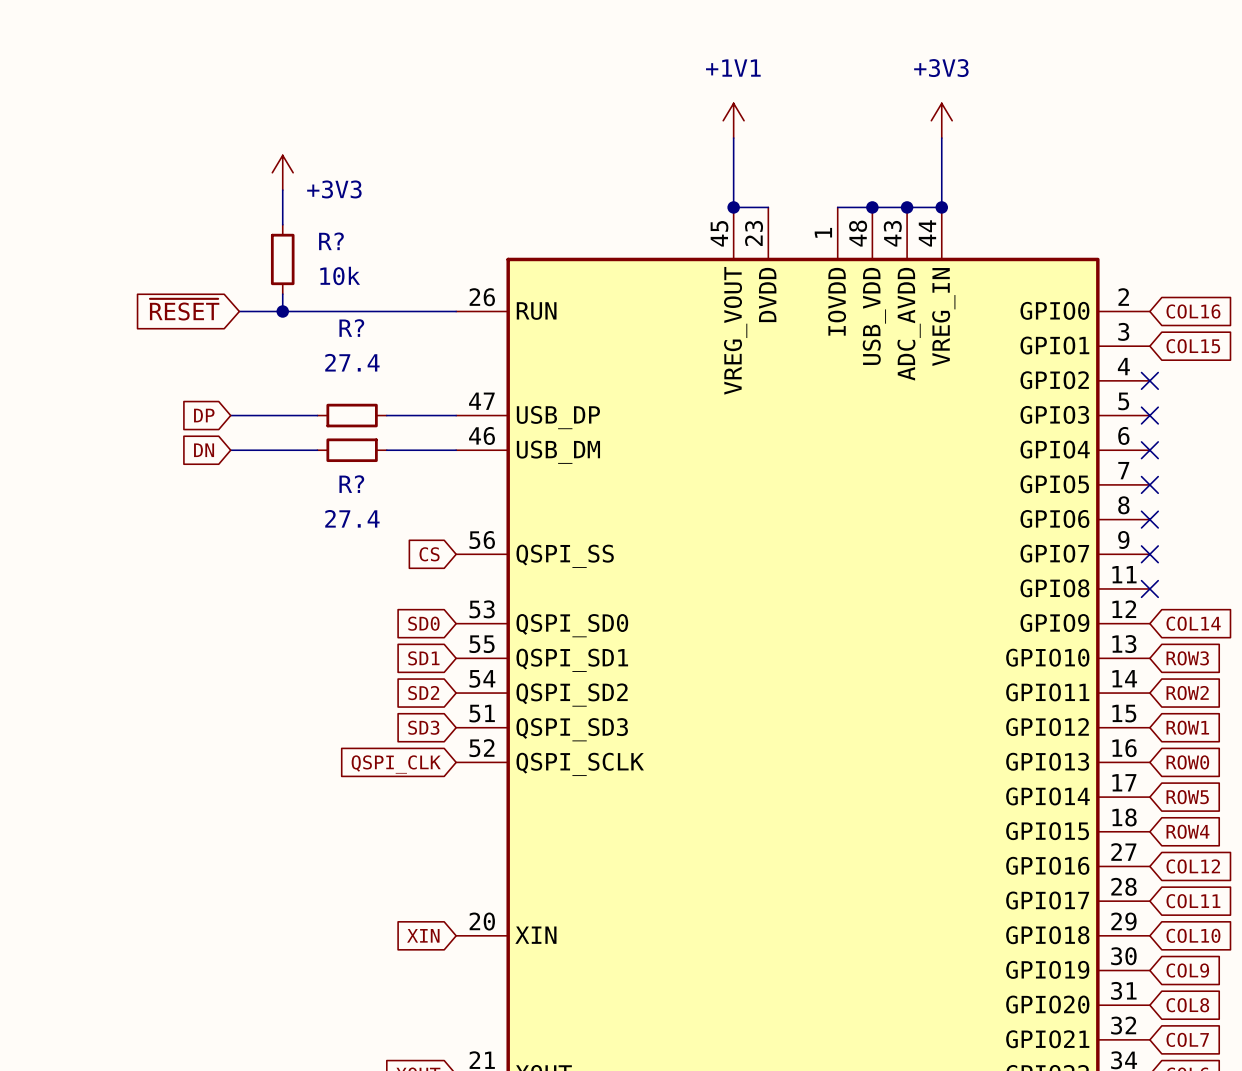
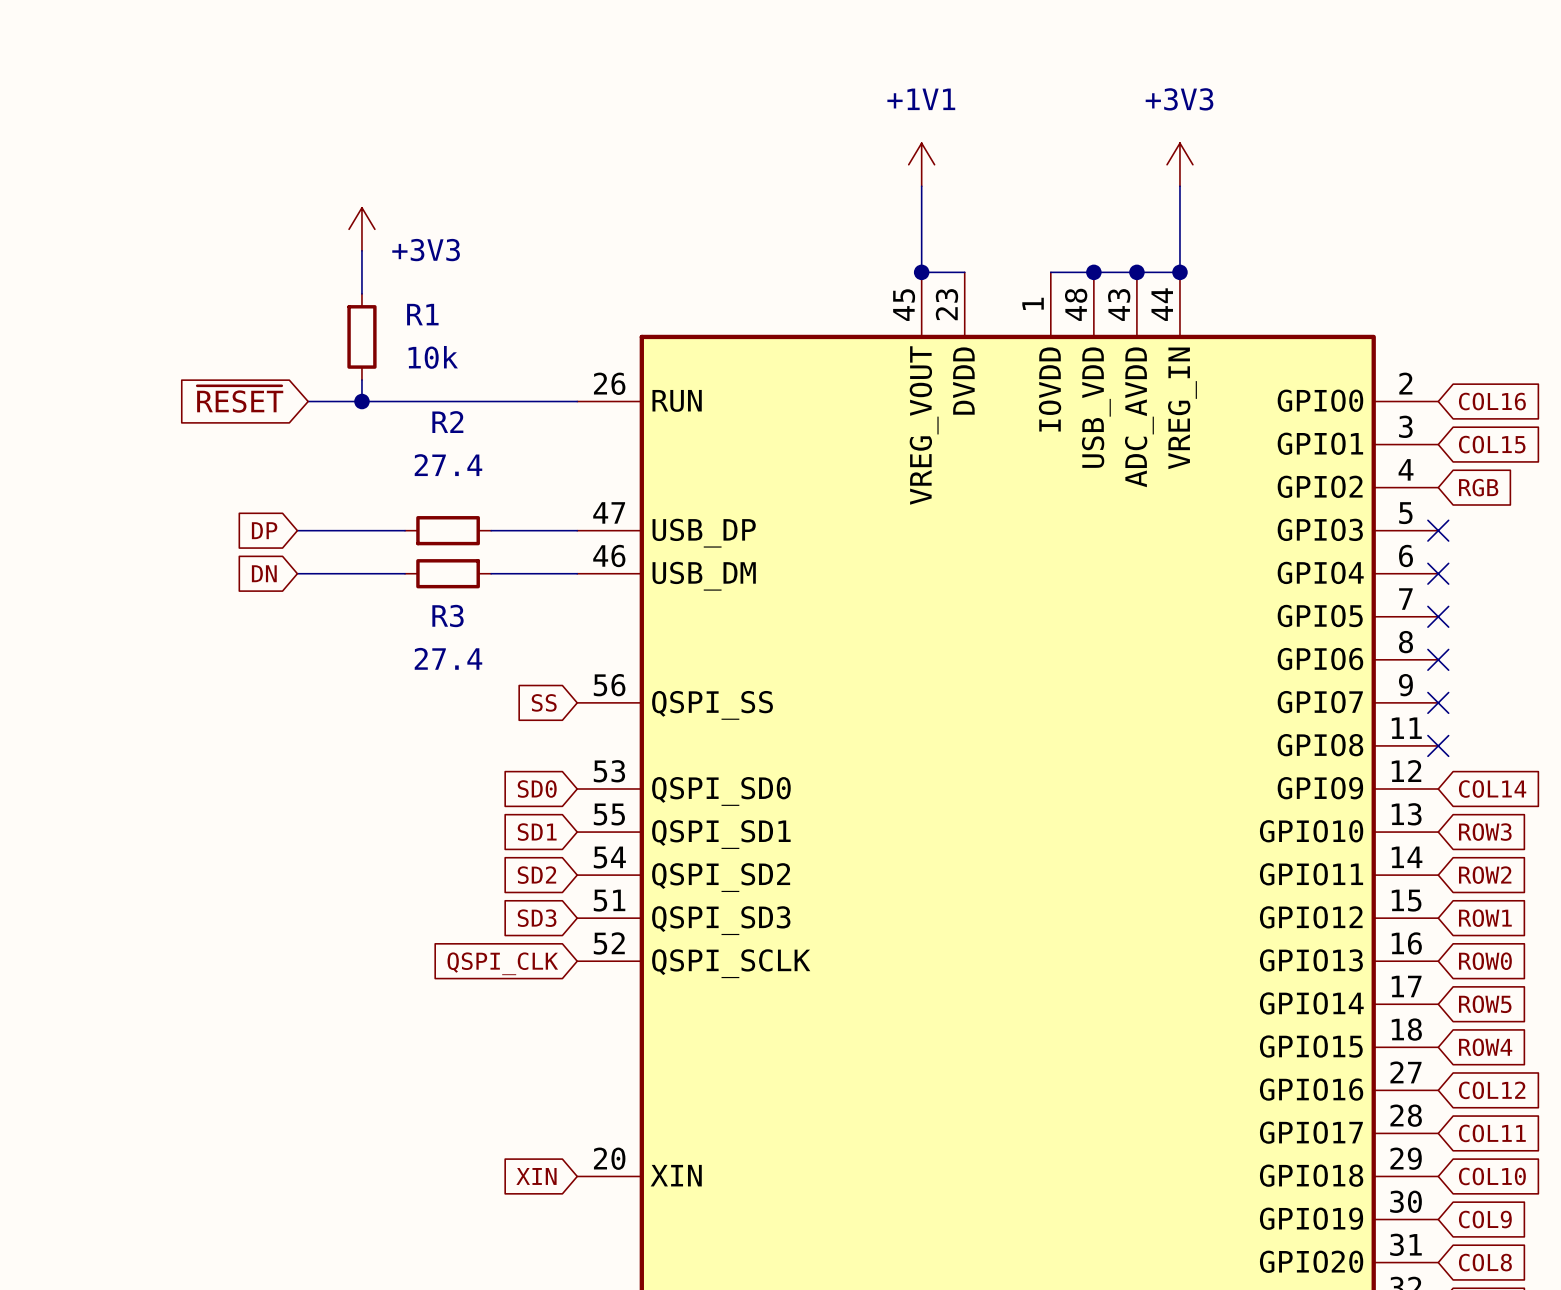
R? name: R? (331, 241) -> R1 (422, 314)
R? name: R? (351, 328) -> R2 (447, 422)
no-connect mark: (1149, 380) -> none
global label: none -> RGB (1478, 487)
R? name: R? (351, 484) -> R3 (448, 615)
global label: CS (429, 554) -> SS (544, 702)

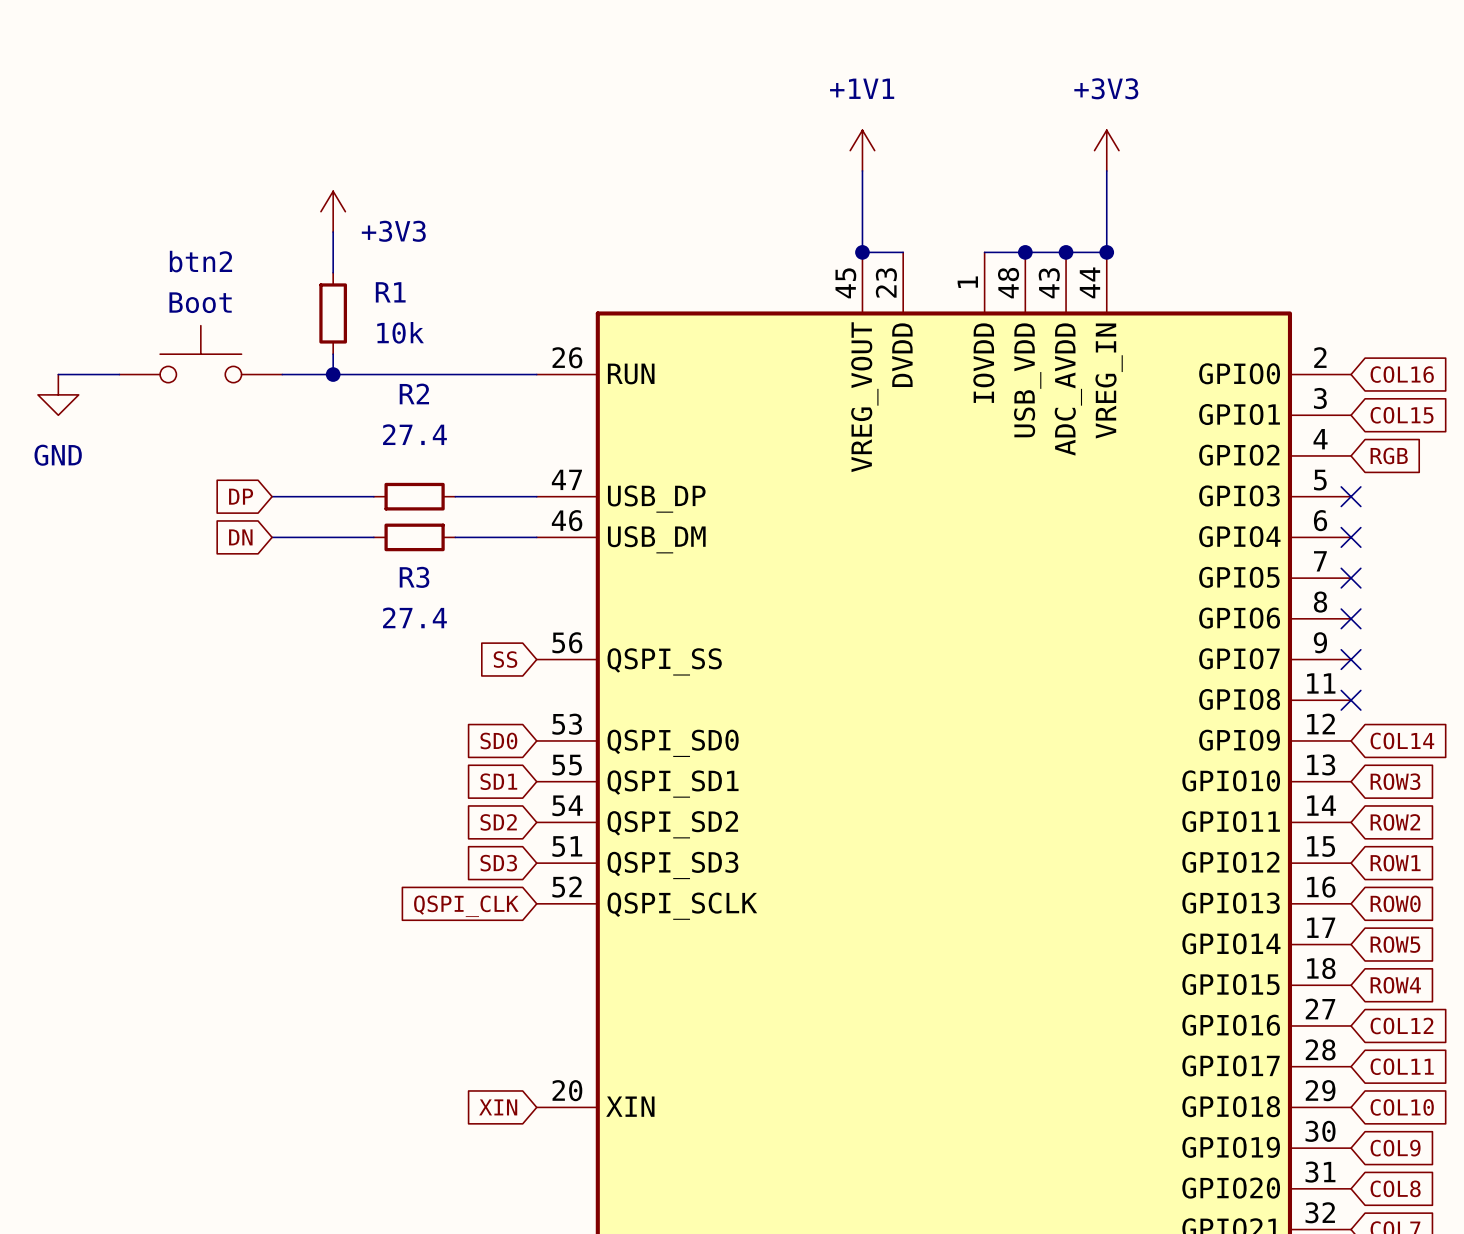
btn2: none -> Boot (200, 354)
global label: ~{RESET} (240, 399) -> none
wire: none -> (58, 374) (119, 374)
power symbol: none -> GND (58, 394)

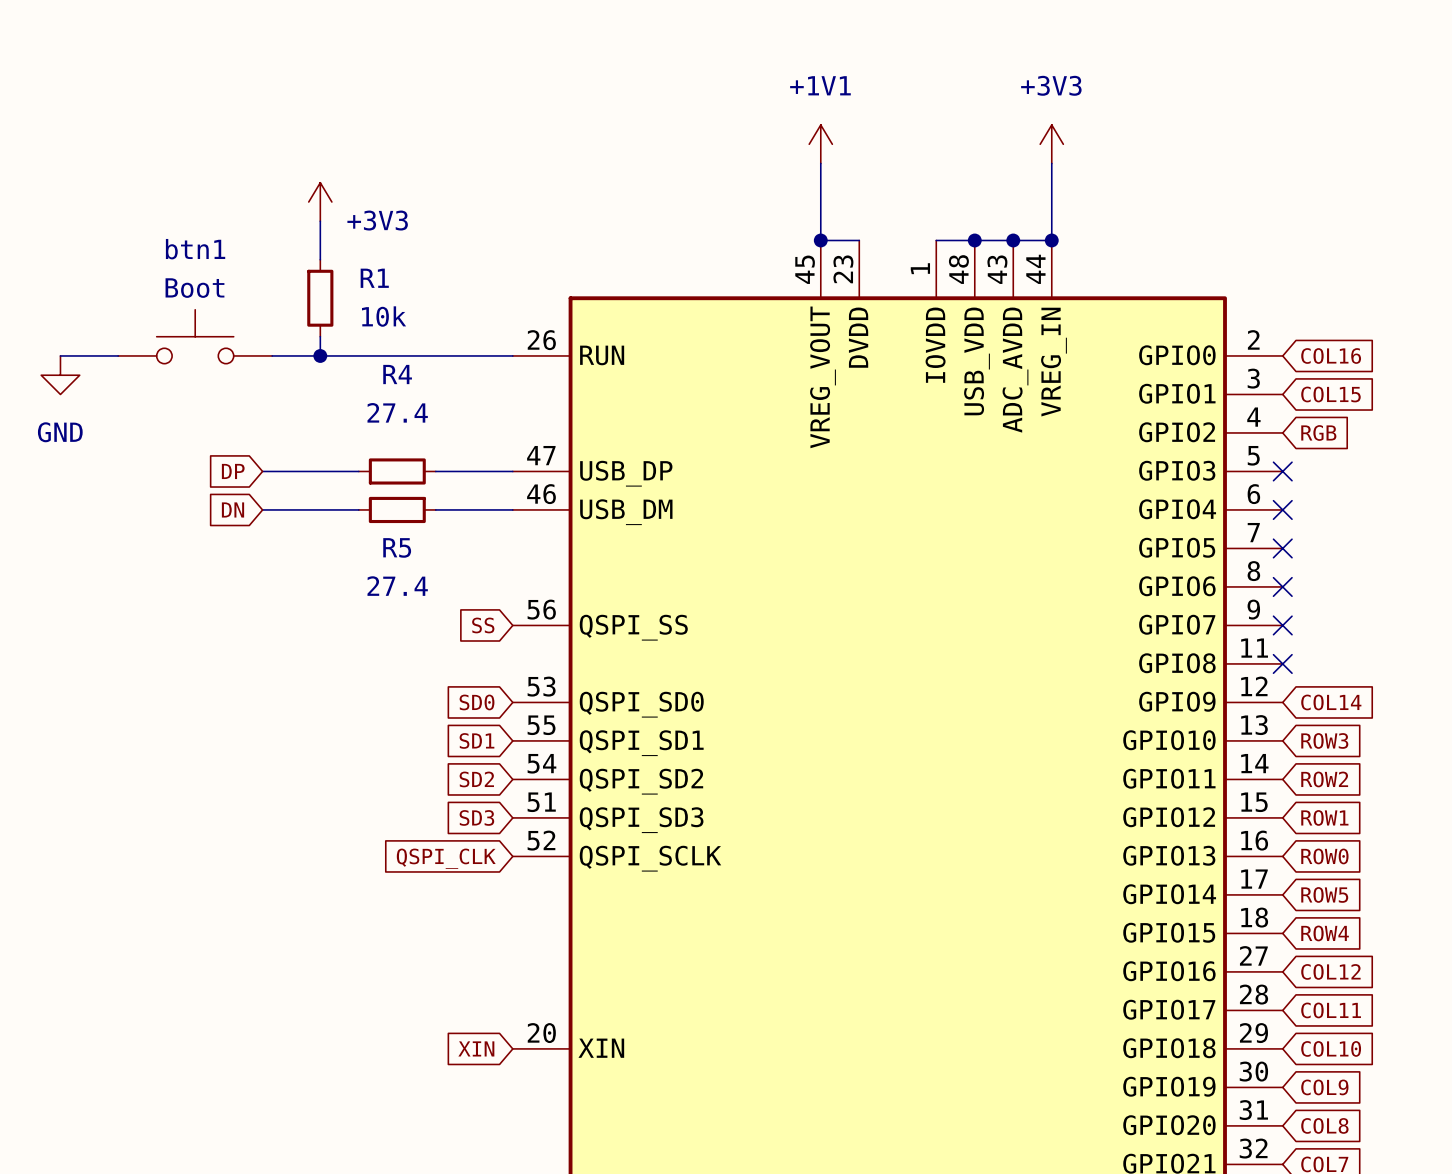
btn2 name: btn2 (200, 261) -> btn1 (195, 249)
R2 name: R2 (414, 393) -> R4 (397, 374)
R3 name: R3 (414, 577) -> R5 (397, 547)

